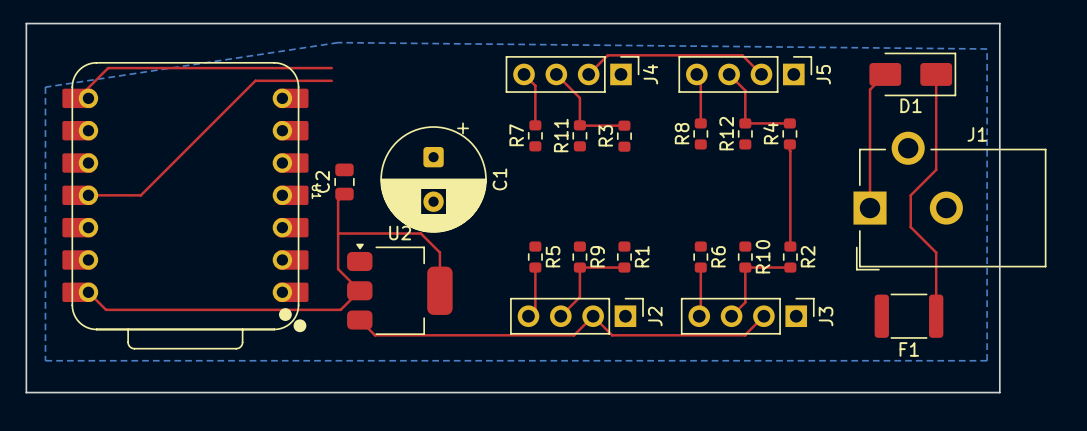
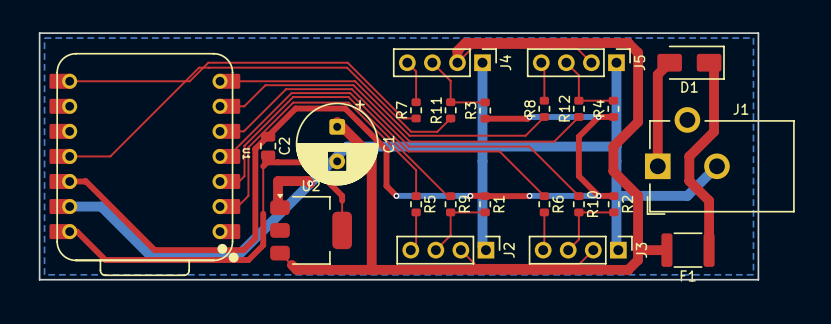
board edge: (26, 23) (999, 23) (999, 392) (26, 392) (26, 23) -> (39, 33) (39, 279) (758, 279) (758, 33) (39, 33)
bottom zone outline: (338, 42) (987, 49) (987, 360) (45, 360) (45, 87) (338, 42) -> (44, 38) (44, 274) (753, 274) (753, 38) (44, 38)
top track: (331, 68) (108, 68) (77, 98) -> none
bottom track: none -> (482, 62) (482, 246) (485, 250)
bottom track: none -> (616, 62) (616, 248) (618, 250)
top track: (885, 74) (870, 89) (870, 208) -> (669, 62) (657, 74) (657, 166)
D1 position: (912, 74) -> (690, 62)
top track: none -> (709, 62) (714, 67) (714, 131) (689, 156) (689, 181) (709, 200) (709, 250)
top track: (936, 74) (936, 169) (910, 195) (910, 227) (936, 252) (936, 316) -> none
top track: none -> (258, 67) (347, 67) (411, 131) (437, 131) (450, 118) (450, 121)
top track: none -> (69, 81) (189, 81) (208, 62) (347, 62) (403, 118) (416, 118)
top track: none -> (228, 81) (355, 81) (409, 135) (525, 135) (544, 116)
top track: none -> (228, 106) (244, 106) (265, 85) (353, 85) (409, 141) (554, 141) (578, 116)
top track: none -> (529, 116) (527, 118) (485, 118)
bottom track: none -> (529, 116) (598, 116)
via: none -> (529, 116)
via: none -> (598, 116)
top track: (789, 144) (790, 246) -> (613, 116) (598, 116) (578, 136) (578, 176) (598, 195) (613, 196)
top track: none -> (337, 121) (371, 156) (371, 269)
top track: none -> (228, 131) (243, 131) (286, 89) (351, 89) (409, 146) (529, 146) (578, 196)
C2 name position: C2 (322, 181) -> C2 (284, 146)
bottom track: none -> (616, 146) (347, 146) (238, 255) (149, 255) (101, 206) (69, 206)
top track: none -> (238, 151) (233, 156) (228, 156) (291, 93) (350, 93) (408, 151) (499, 151) (544, 196)
J1 position: (949, 201) -> (719, 160)
bottom track: none -> (716, 166) (687, 195) (616, 195)
top track: none -> (69, 181) (85, 181) (154, 250) (243, 250) (255, 238) (255, 148) (295, 108) (345, 108) (386, 149) (386, 186) (396, 195)
top track: none -> (228, 181) (239, 181) (244, 176) (244, 145) (293, 97) (348, 97) (447, 196) (450, 196)
top track: none -> (310, 183) (307, 181) (278, 181) (278, 205) (280, 207)
via: none -> (310, 183)
top track: (338, 233) (420, 233) (439, 252) -> (263, 166) (267, 162) (308, 162) (342, 195) (342, 200)
bottom track: none -> (396, 195) (470, 195)
via: none -> (396, 195)
top track: none -> (416, 196) (416, 170) (348, 102) (293, 102) (248, 147) (248, 195) (237, 206) (228, 205)
top track: none -> (470, 195) (529, 195)
via: none -> (470, 195)
bottom track: none -> (529, 195) (598, 195)
via: none -> (529, 195)
via: none -> (598, 195)
top track: (338, 269) (359, 290) (340, 309) (106, 309) (88, 292) -> (263, 213) (263, 245) (248, 260) (105, 260) (76, 231) (69, 231)
top track: (592, 316) (574, 335) (375, 335) -> (457, 62) (457, 50) (465, 42) (628, 42) (638, 52) (638, 121) (613, 146) (613, 171) (638, 195) (638, 260) (628, 269) (296, 269) (291, 264)
top track: none -> (638, 250) (666, 250)
F1 position: (908, 316) -> (688, 250)

